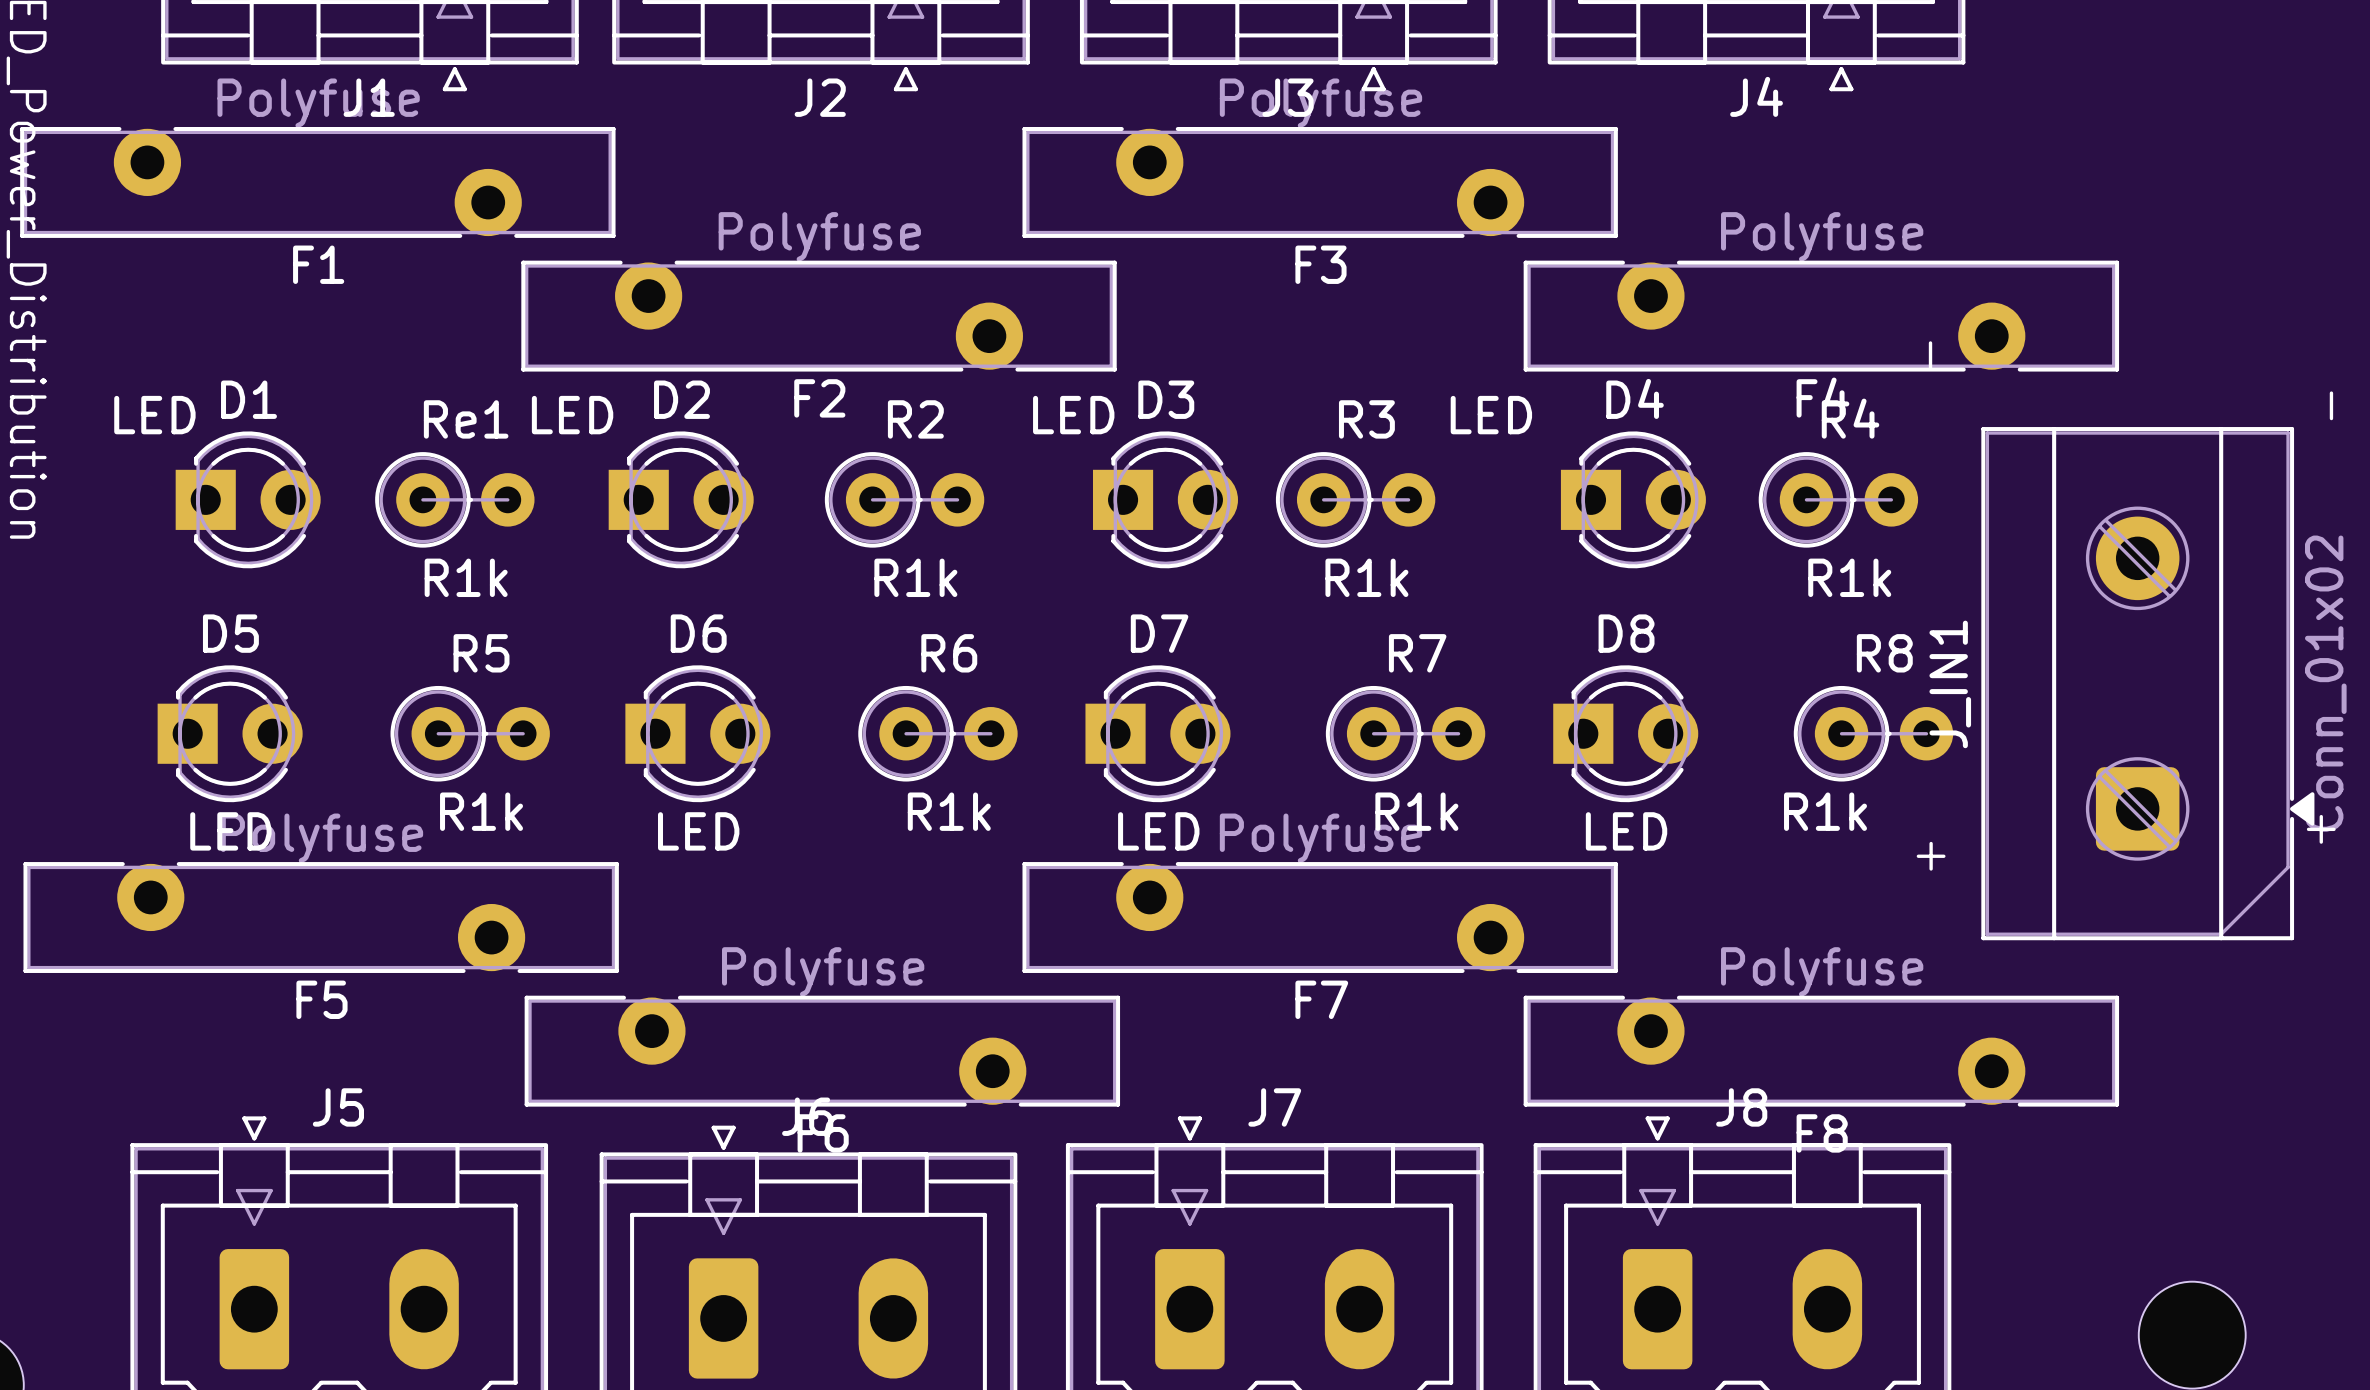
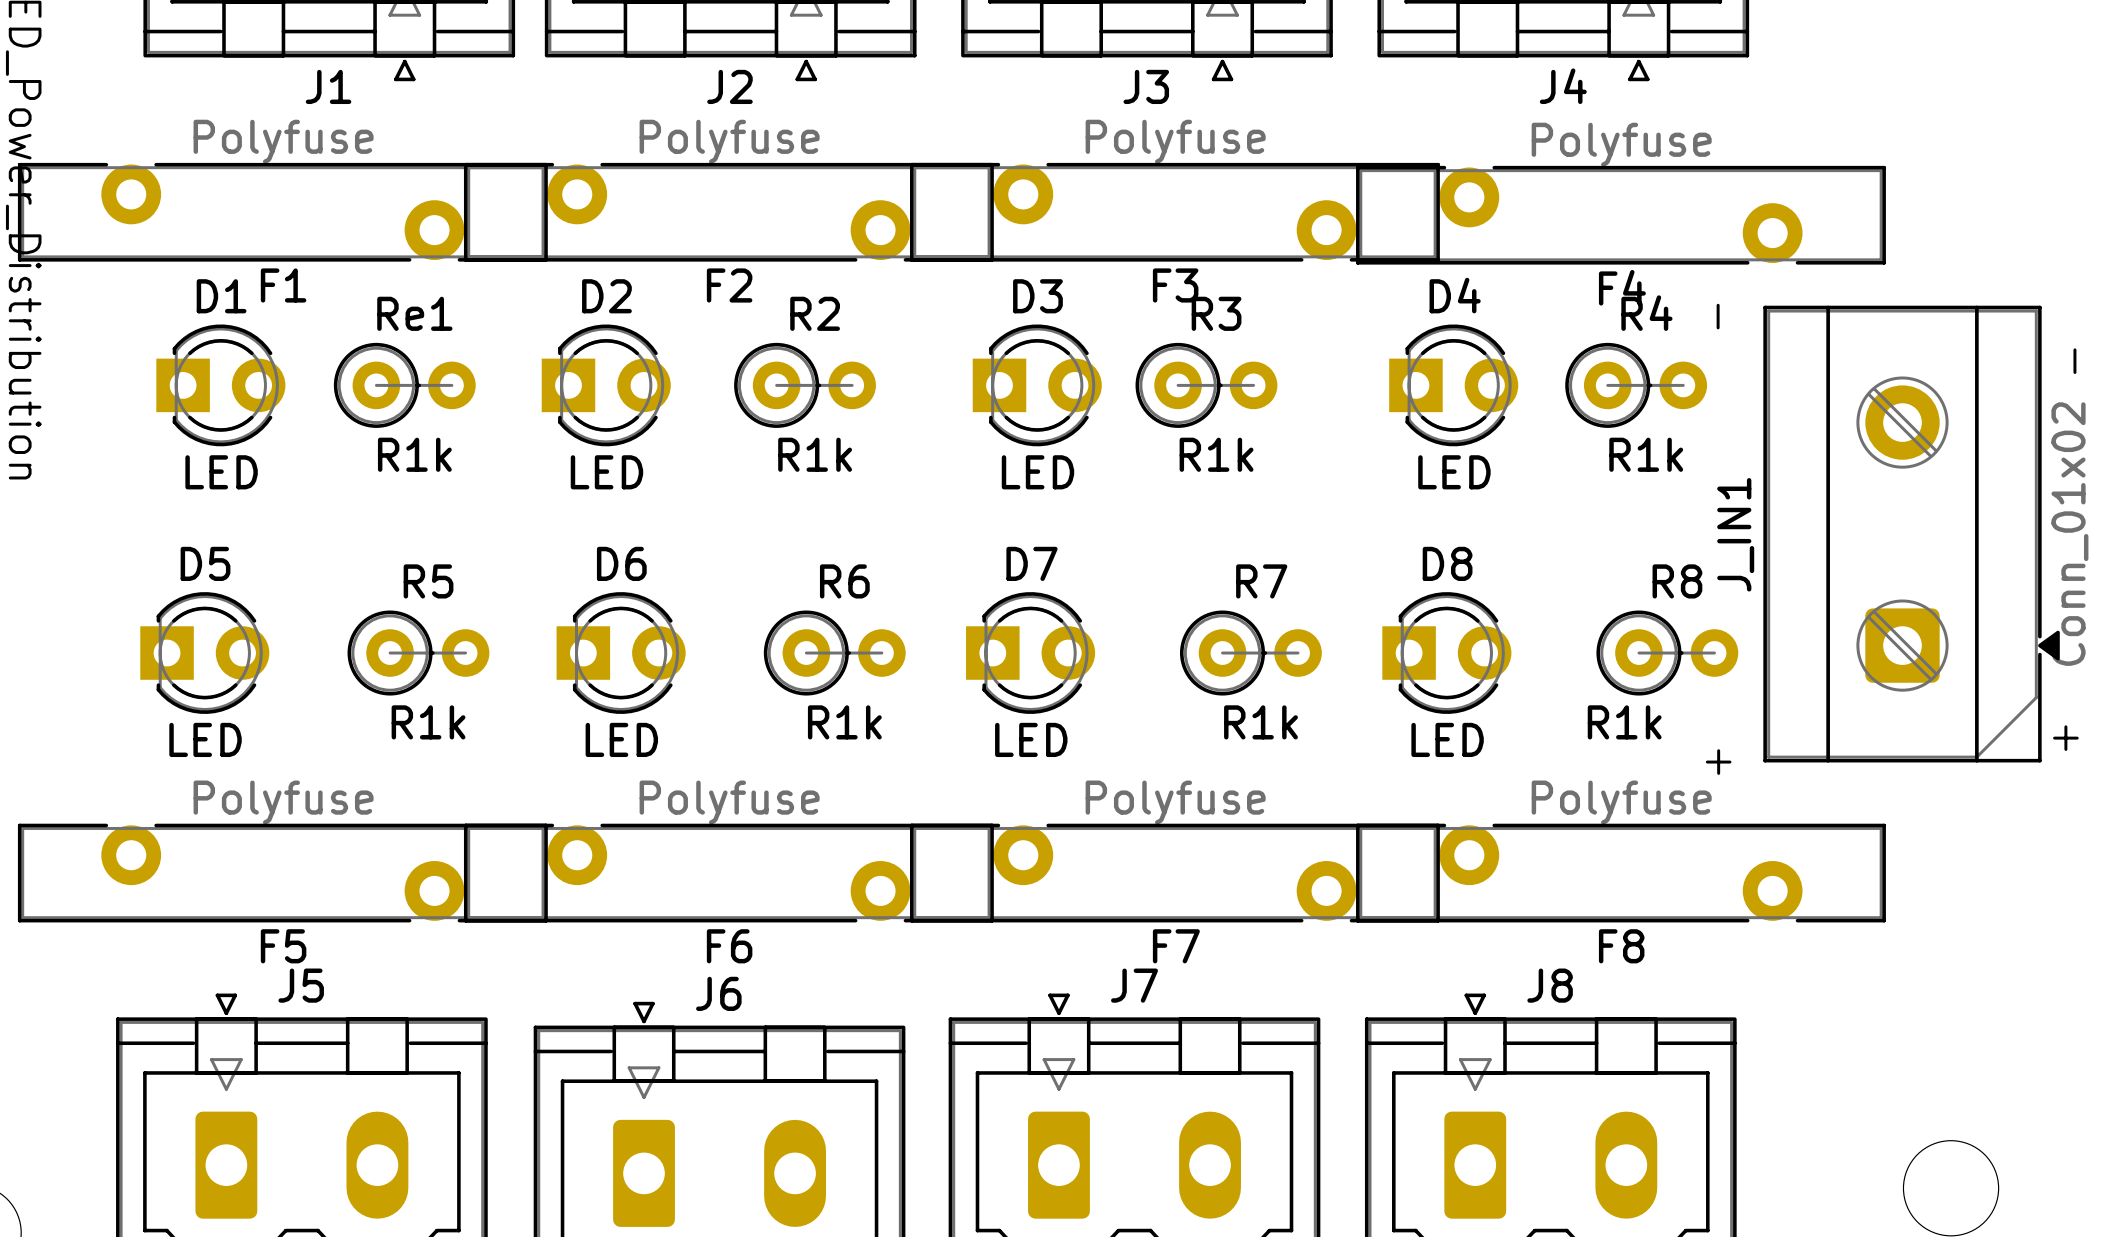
F1 position: (317, 182) -> (282, 212)
F3 position: (1320, 182) -> (1174, 212)
F2 position: (819, 316) -> (728, 212)
F4 position: (1821, 316) -> (1620, 215)
D1 value position: LED (154, 415) -> LED (221, 472)
D2 value position: LED (572, 415) -> LED (606, 472)
D3 value position: LED (1073, 415) -> LED (1037, 472)
D4 value position: LED (1491, 415) -> LED (1454, 472)
D1 position: (248, 499) -> (220, 385)
Re1 position: (454, 499) -> (404, 385)
D2 position: (681, 499) -> (606, 385)
R2 position: (904, 499) -> (805, 385)
D3 position: (1165, 499) -> (1037, 385)
R3 position: (1355, 499) -> (1206, 385)
D4 position: (1633, 499) -> (1453, 385)
R4 position: (1838, 499) -> (1636, 385)
J_IN1 position: (2147, 683) -> (1911, 534)
F5 position: (321, 917) -> (282, 873)
F7 position: (1320, 917) -> (1174, 873)
F6 position: (822, 1051) -> (728, 873)
F8 position: (1821, 1051) -> (1620, 873)

